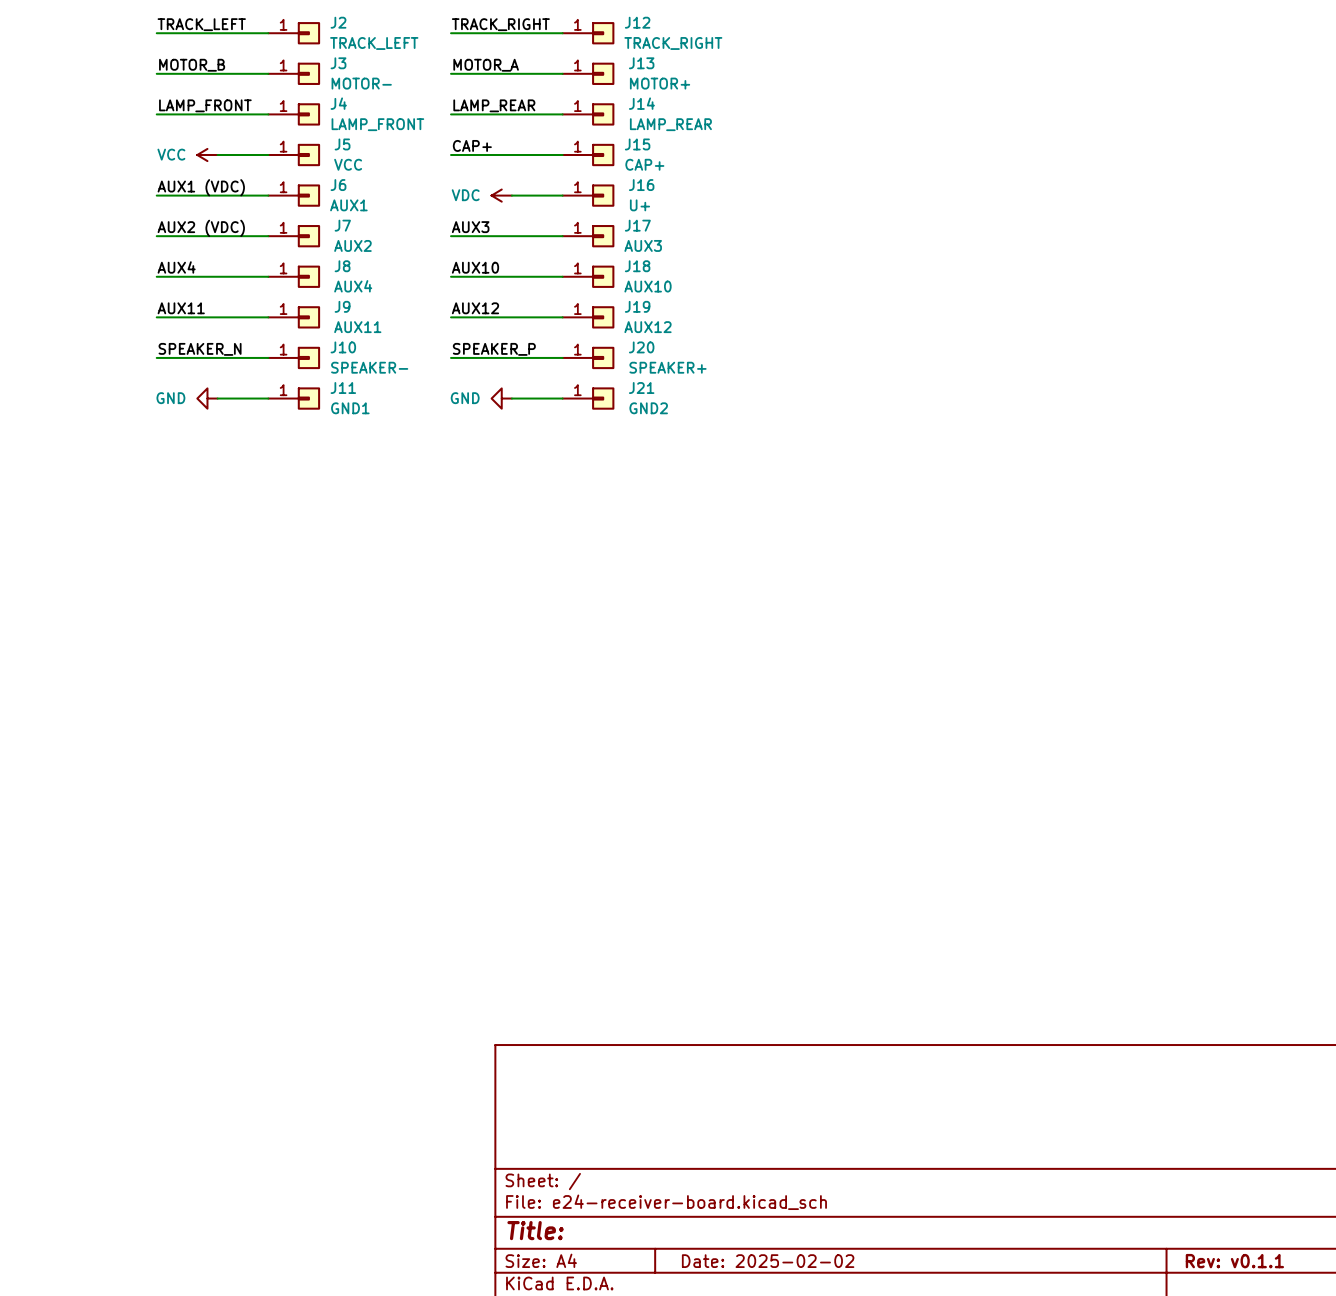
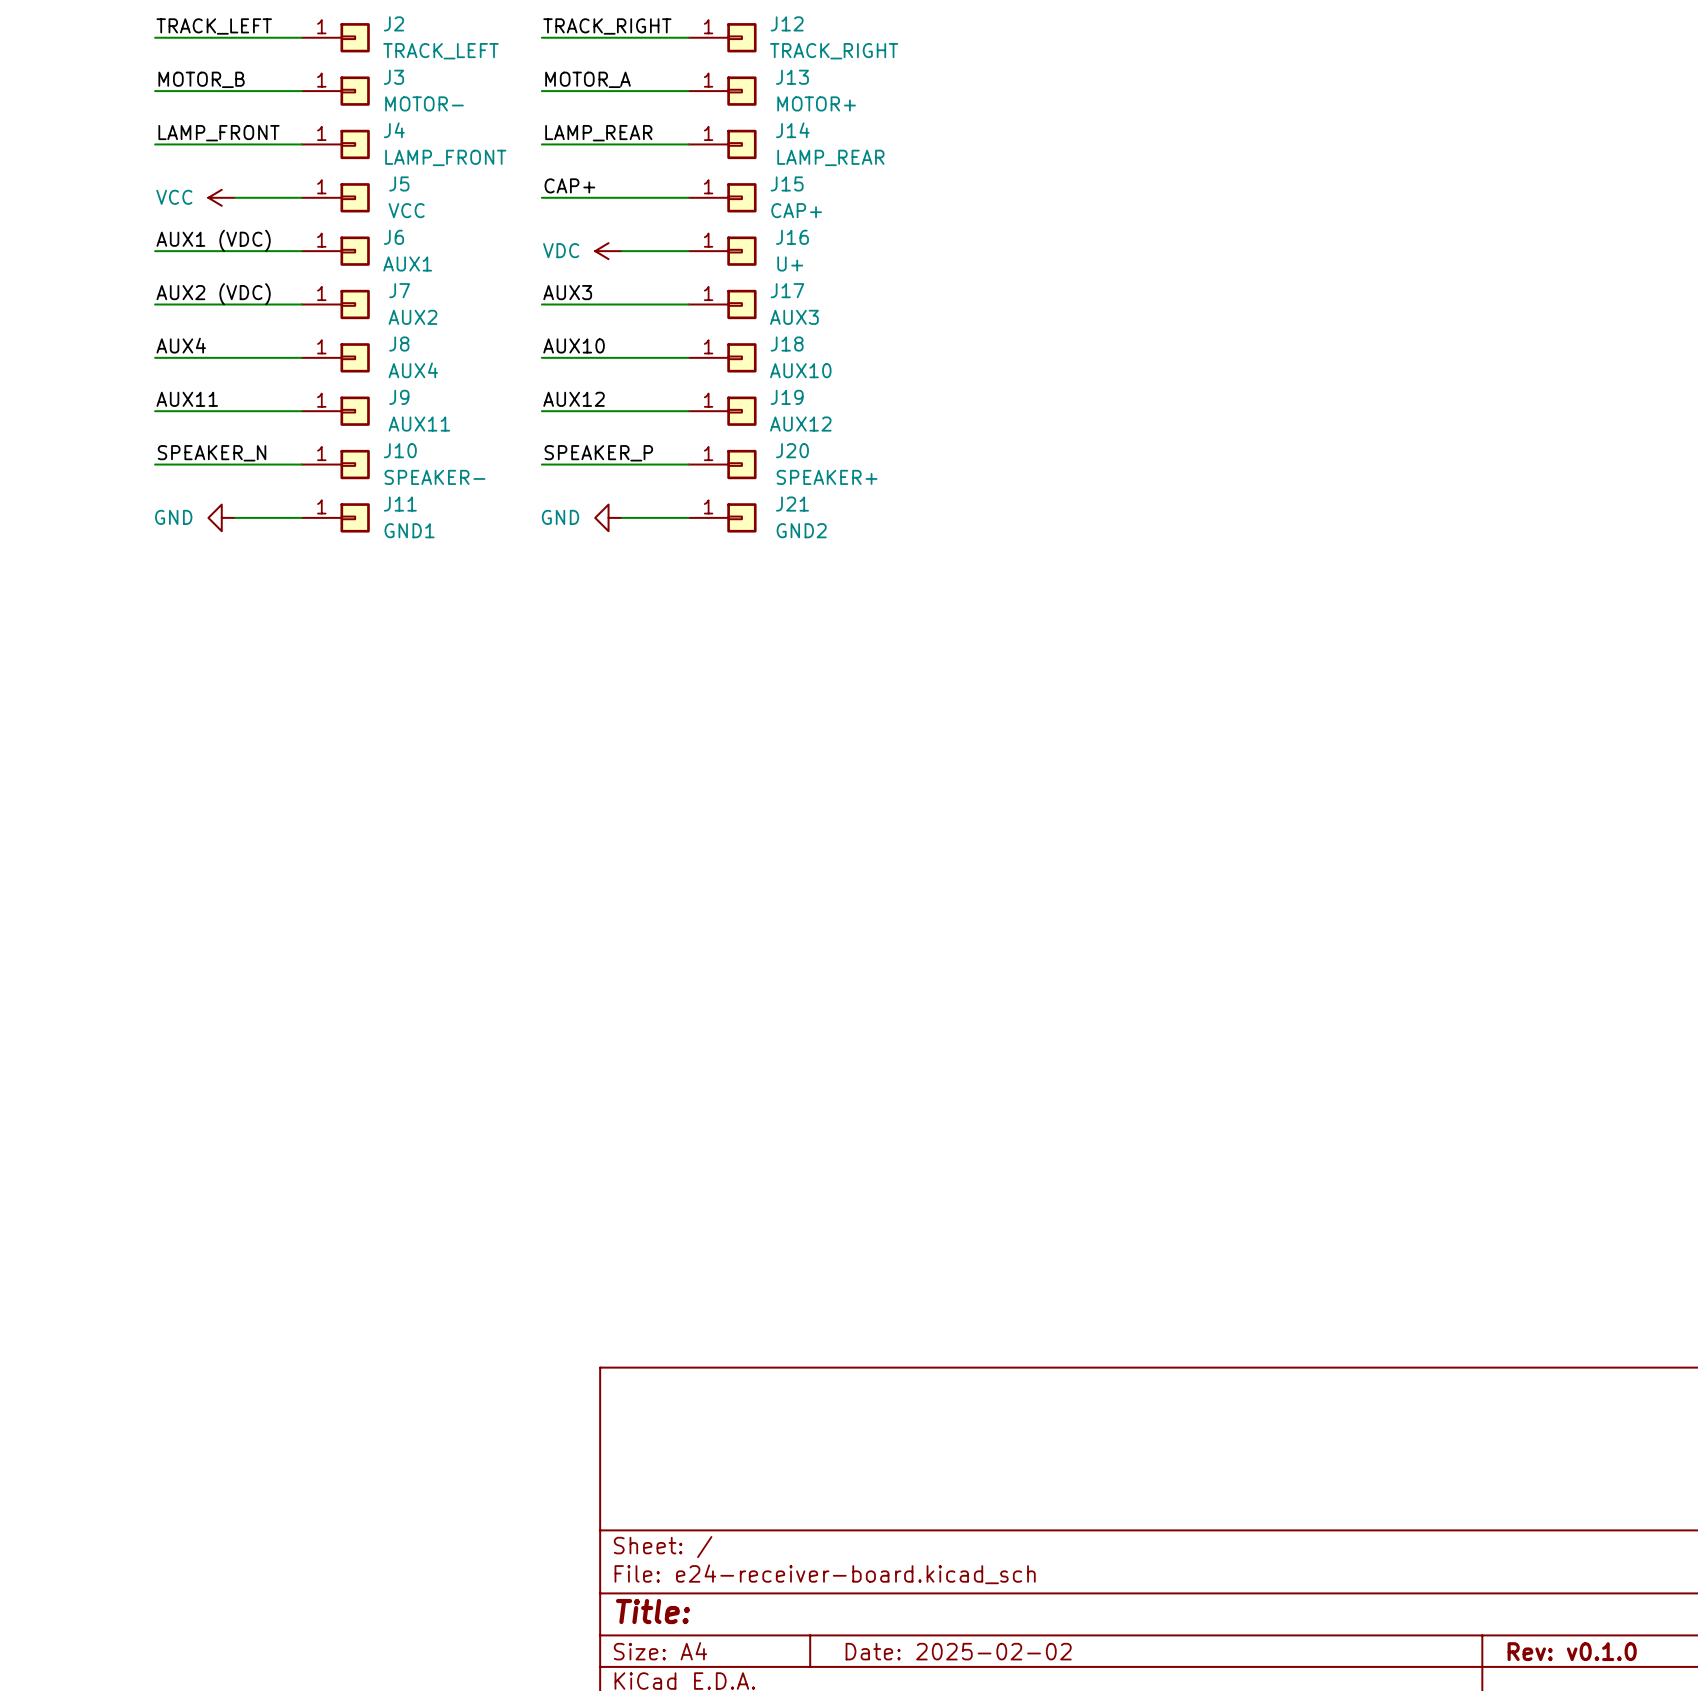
title block: Rev: v0.1.1 (1234, 1261) -> Rev: v0.1.0 (1572, 1651)

